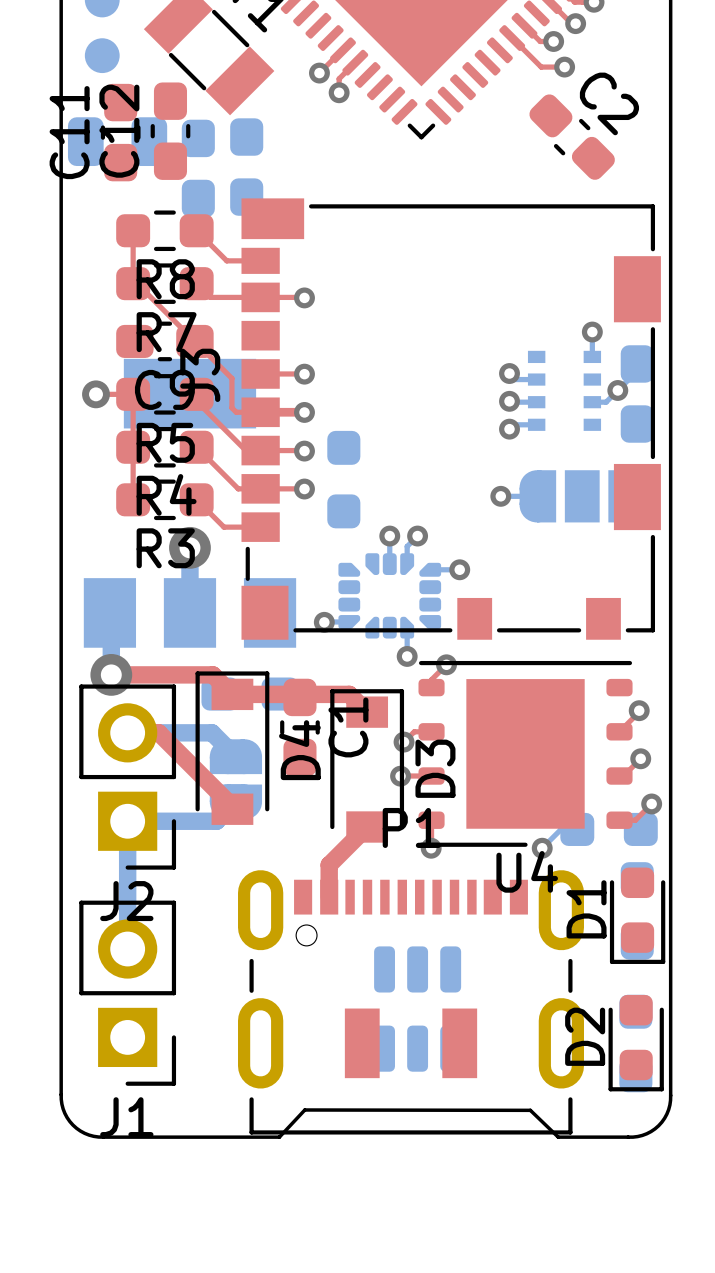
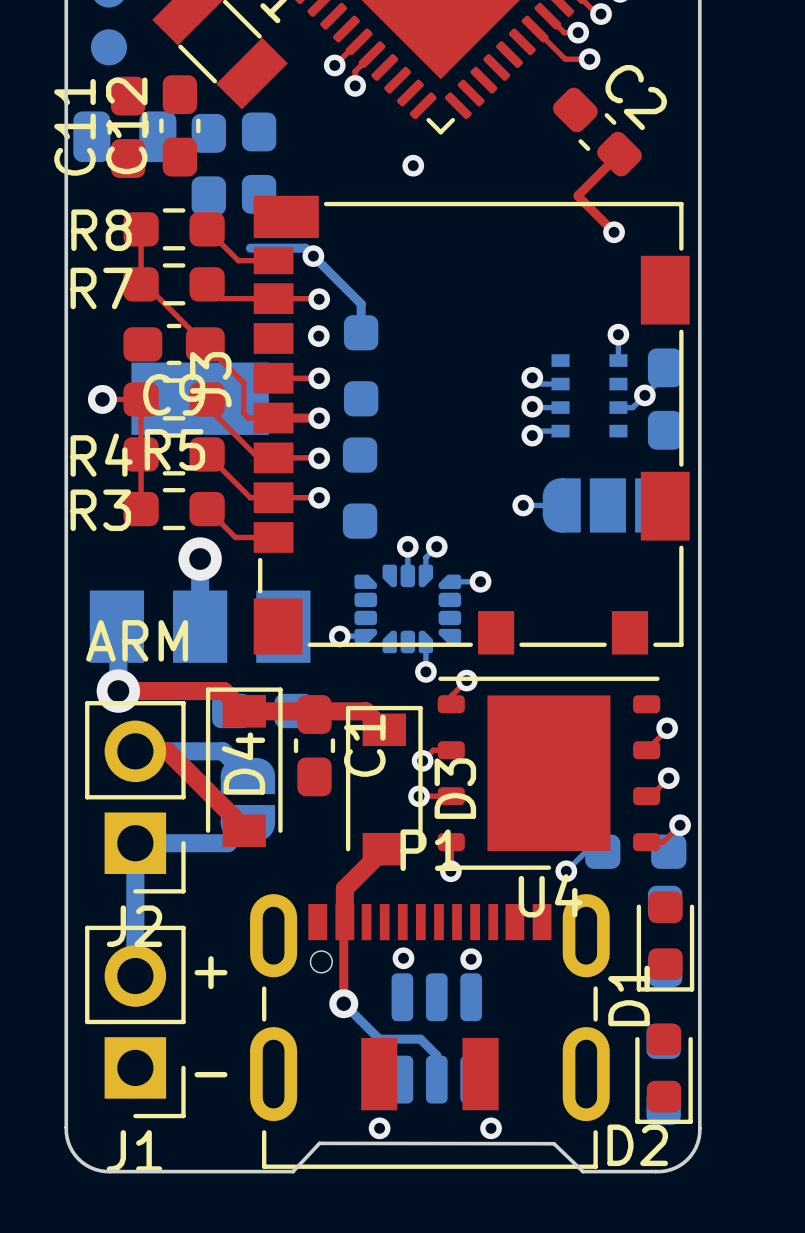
top track: none -> (619, 154) (578, 195) (614, 232)
via: none -> (413, 165)
via: none -> (614, 232)
bottom track: none -> (250, 248) (305, 248) (361, 303) (361, 332)
via: none -> (313, 256)
R8 name position: R8 (165, 279) -> R8 (101, 230)
R7 name position: R7 (166, 332) -> R7 (101, 288)
via: none -> (318, 336)
part: none -> (361, 365)
R4 name position: R4 (166, 494) -> R4 (101, 455)
R3 name position: R3 (165, 548) -> R3 (100, 510)
text: none -> ARM (137, 640)
D4 name position: D4 (299, 750) -> D4 (243, 763)
top track: none -> (344, 922) (343, 1003)
D1 name position: D1 (586, 909) -> D1 (629, 995)
via: none -> (403, 958)
via: none -> (471, 959)
text: none -> + (210, 972)
bottom track: none -> (343, 1003) (379, 1039) (420, 1039) (436, 1055) (436, 1079)
via: none -> (343, 1003)
D2 name rotation: 0° (585, 1036) -> 90° clockwise (637, 1145)
text: none -> - (210, 1074)
via: none -> (379, 1128)
via: none -> (491, 1128)

